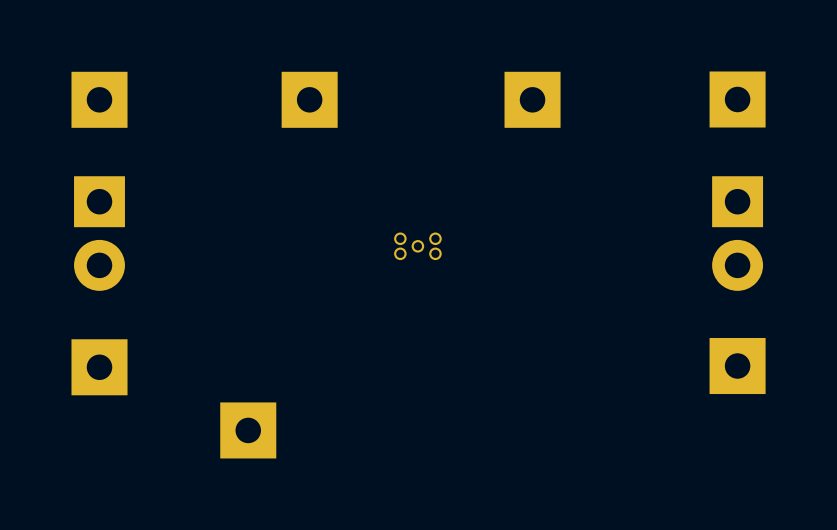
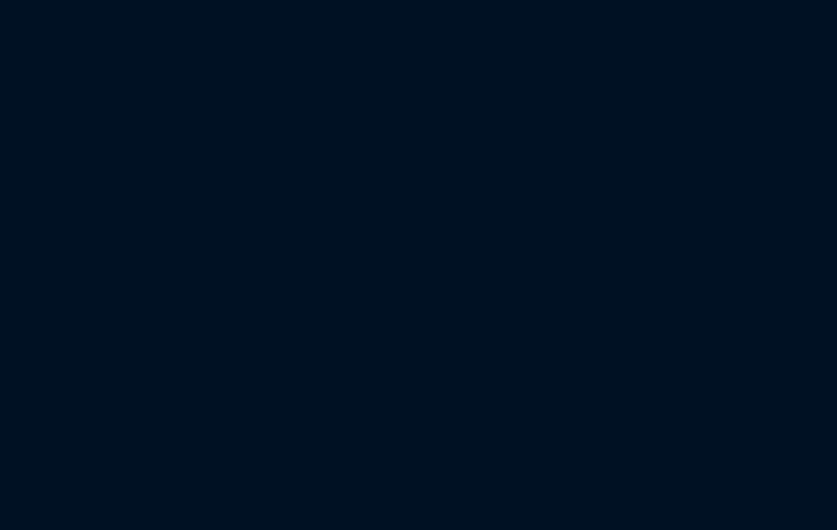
part: (99, 99) -> none
part: (309, 99) -> none
part: (532, 99) -> none
part: (737, 99) -> none
part: (99, 233) -> none
part: (737, 233) -> none
part: (417, 246) -> none
part: (737, 366) -> none
part: (99, 367) -> none
part: (248, 430) -> none

